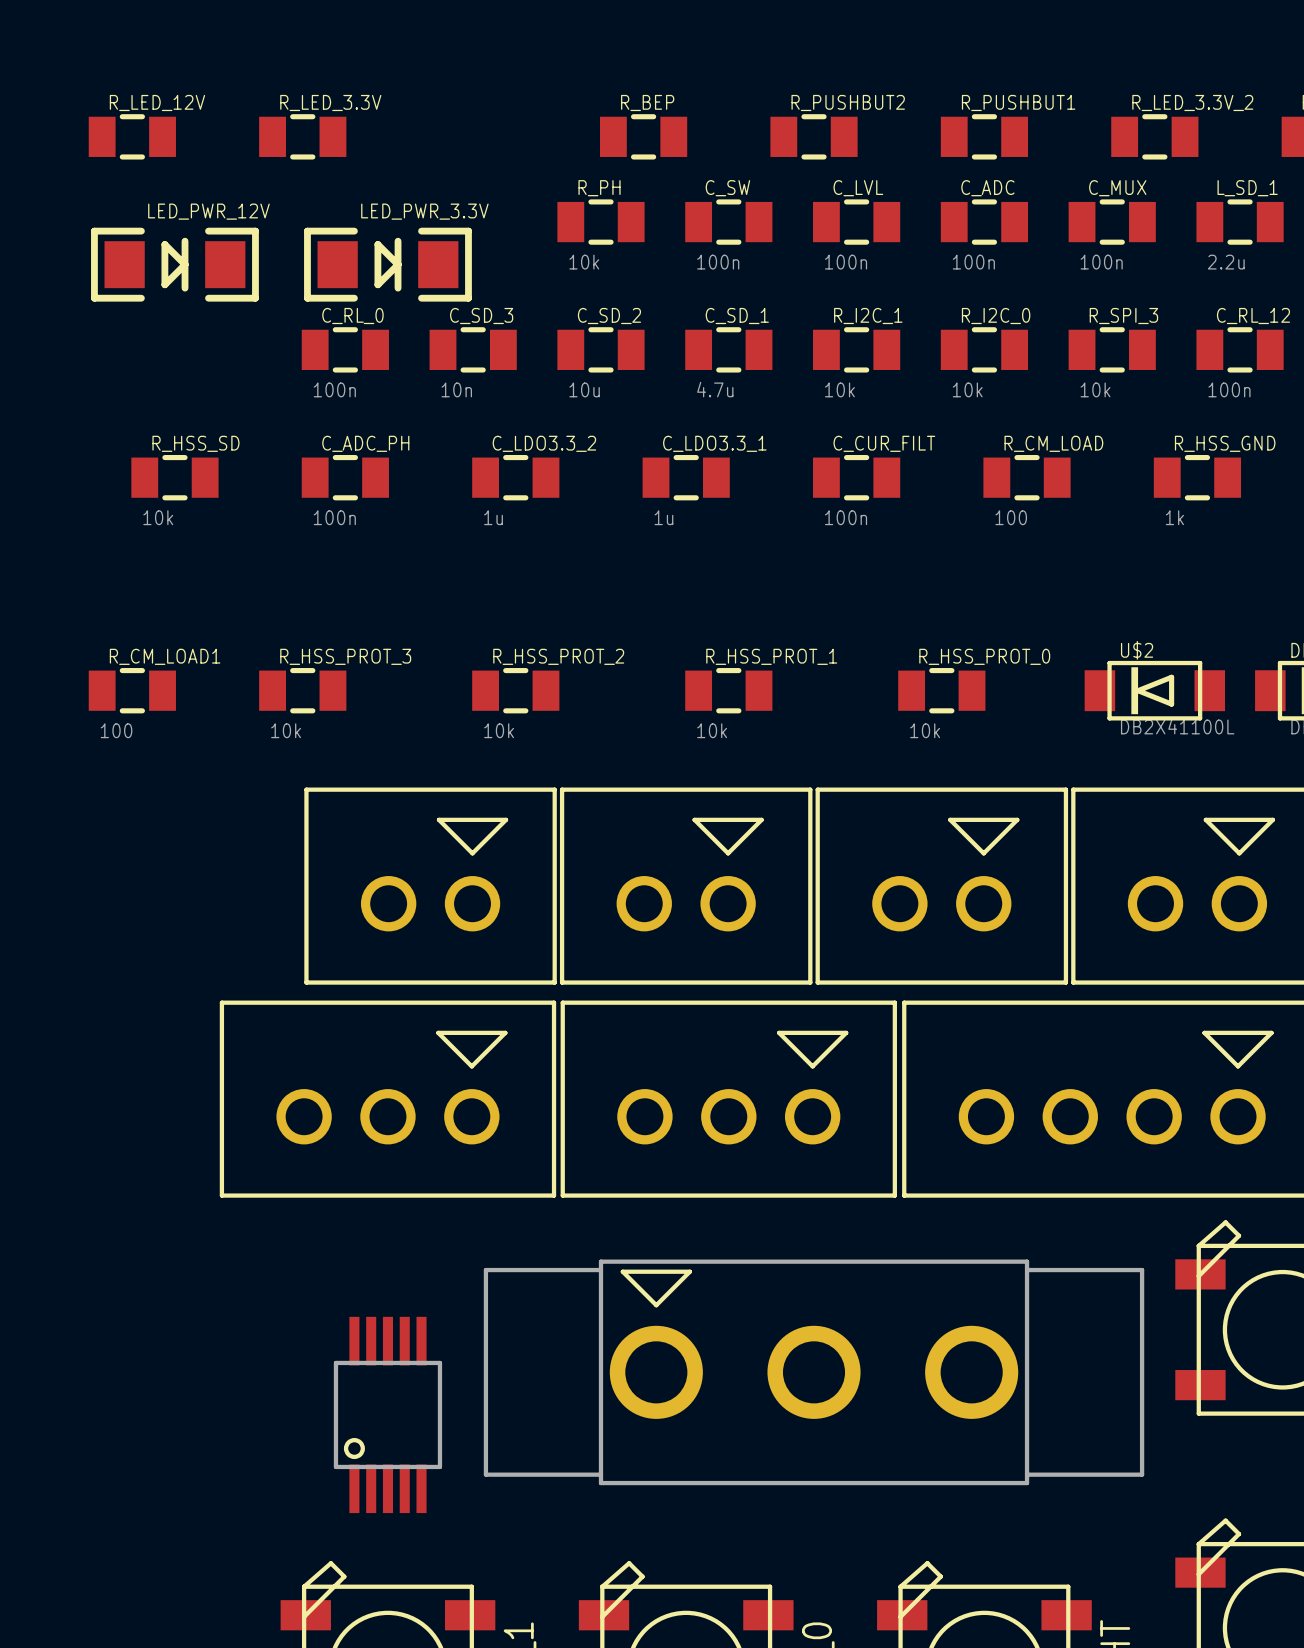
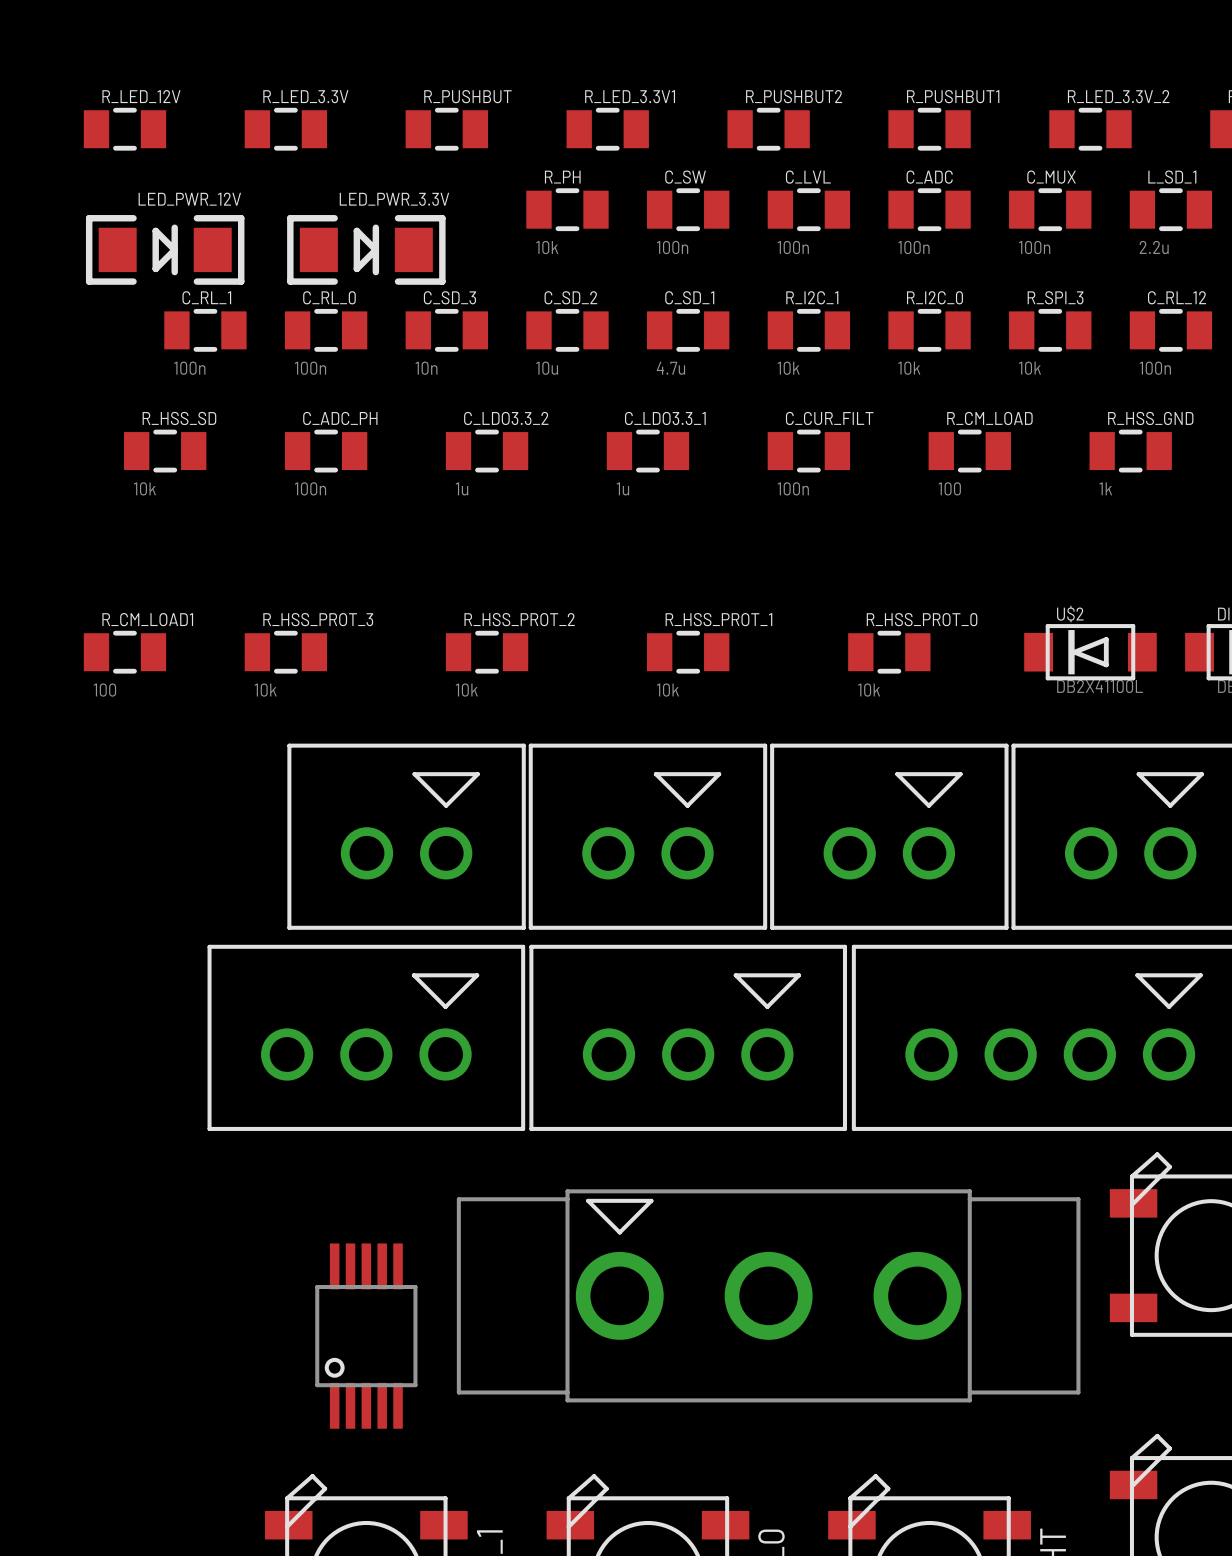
R_BEP name: R_BEP (647, 102) -> R_LED_3.3V1 (630, 96)
R_PUSHBUT: none -> (446, 129)
C_RL_1: none -> 100n (205, 330)

